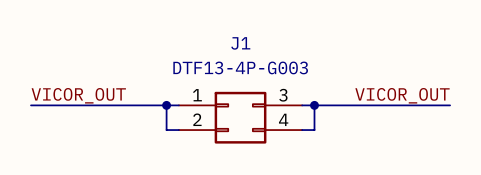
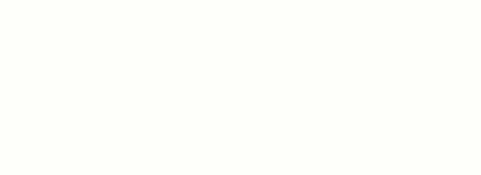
label: VICOR_OUT (78, 95) -> none
label: VICOR_OUT (402, 95) -> none
wire: (31, 105) (178, 105) -> none
wire: (166, 105) (166, 130) (178, 130) -> none
junction: (166, 105) -> none
wire: (302, 105) (450, 105) -> none
wire: (314, 105) (314, 130) (302, 130) -> none
junction: (314, 105) -> none
J1: DTF13-4P-G003 (240, 117) -> none

